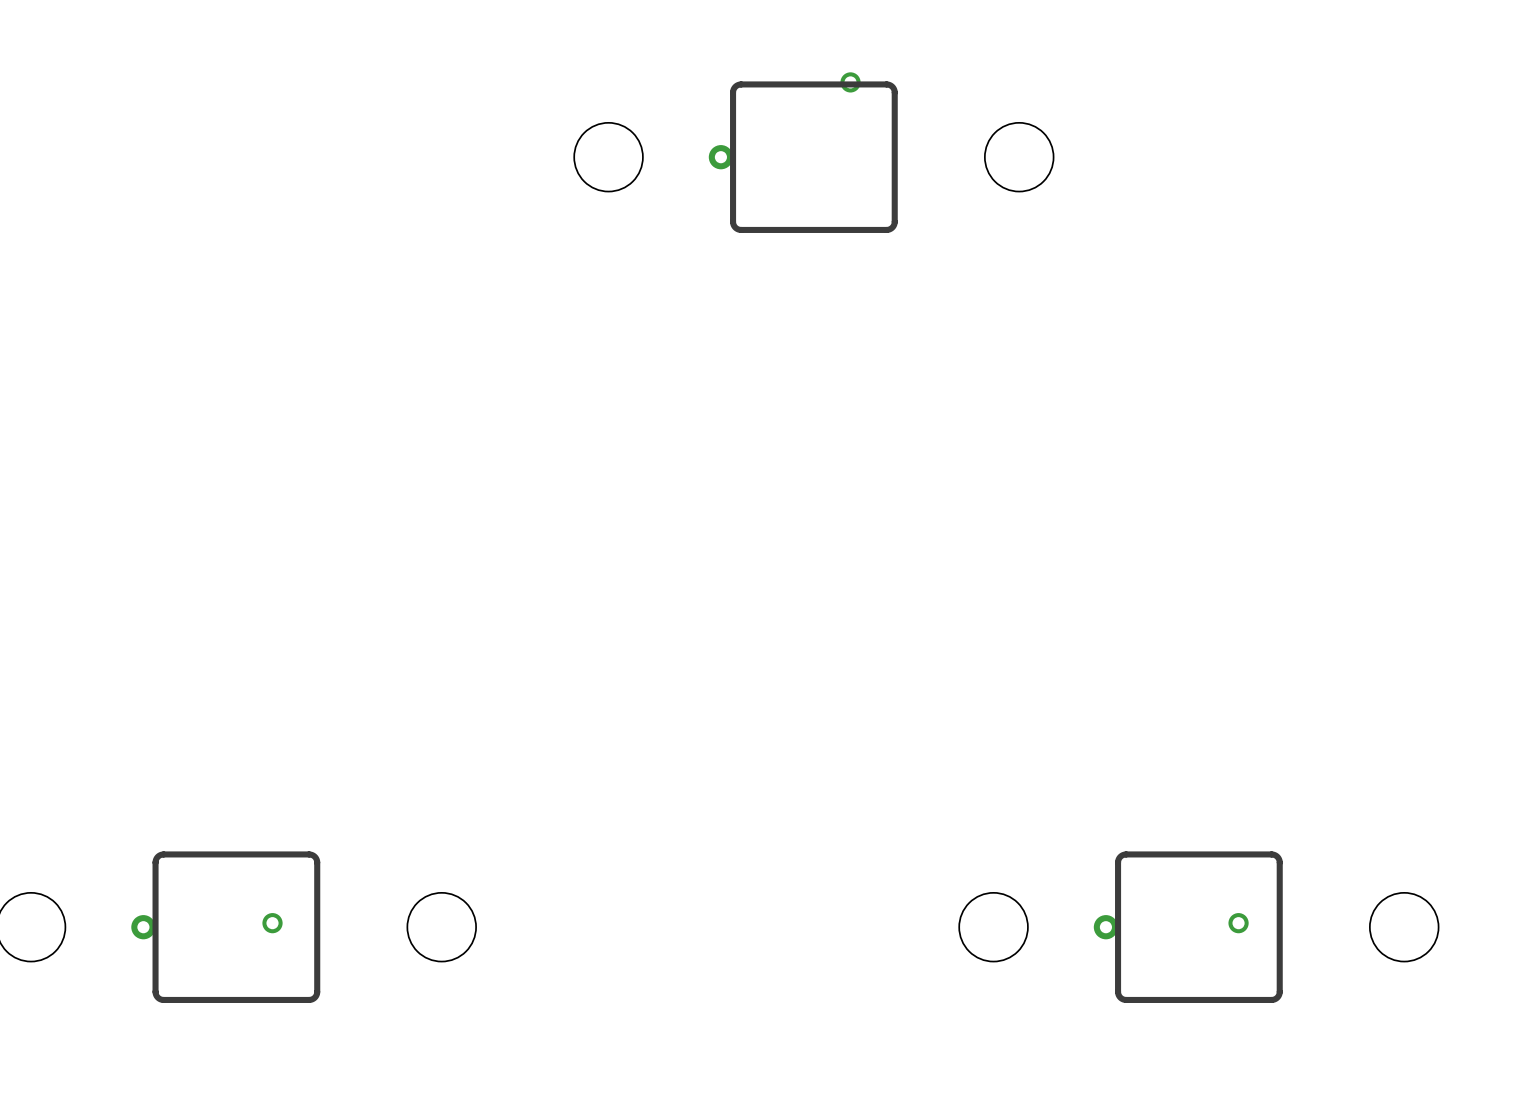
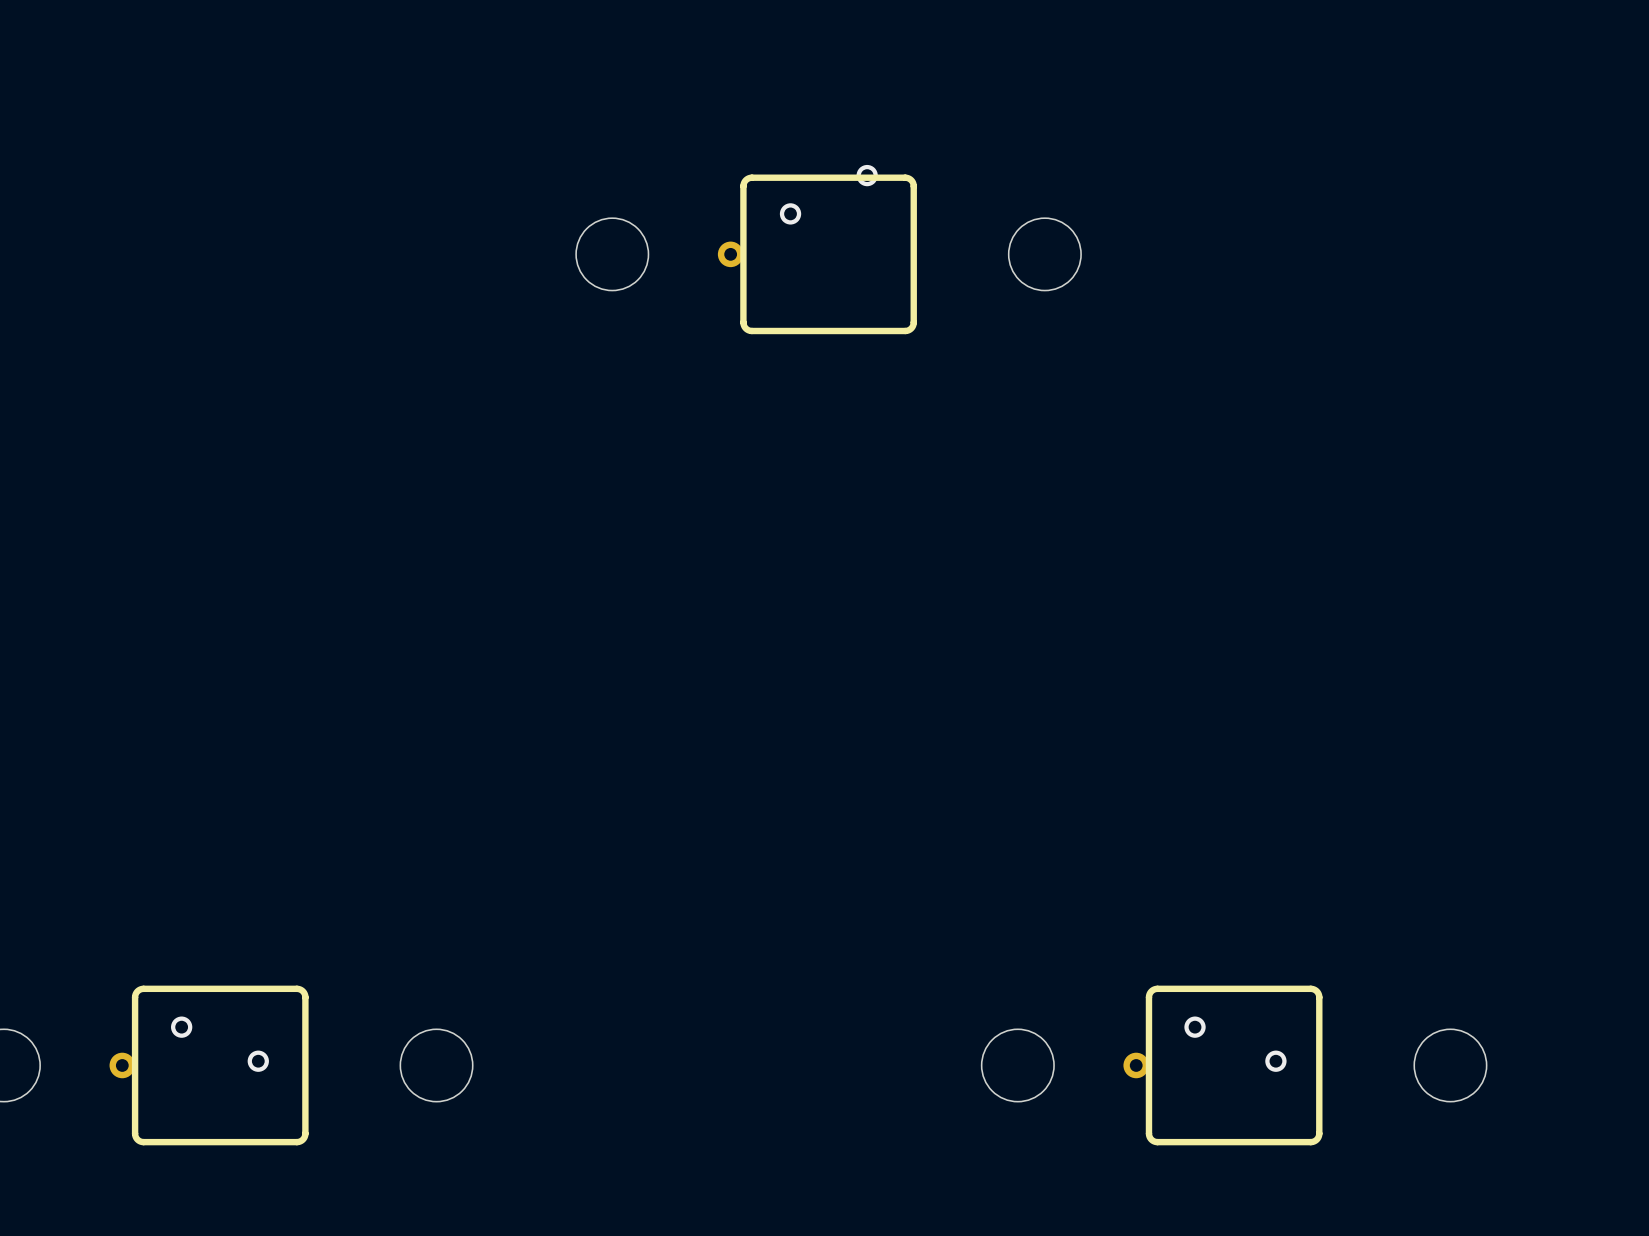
via: none -> (790, 213)
via: none -> (181, 1027)
via: none -> (1195, 1027)

